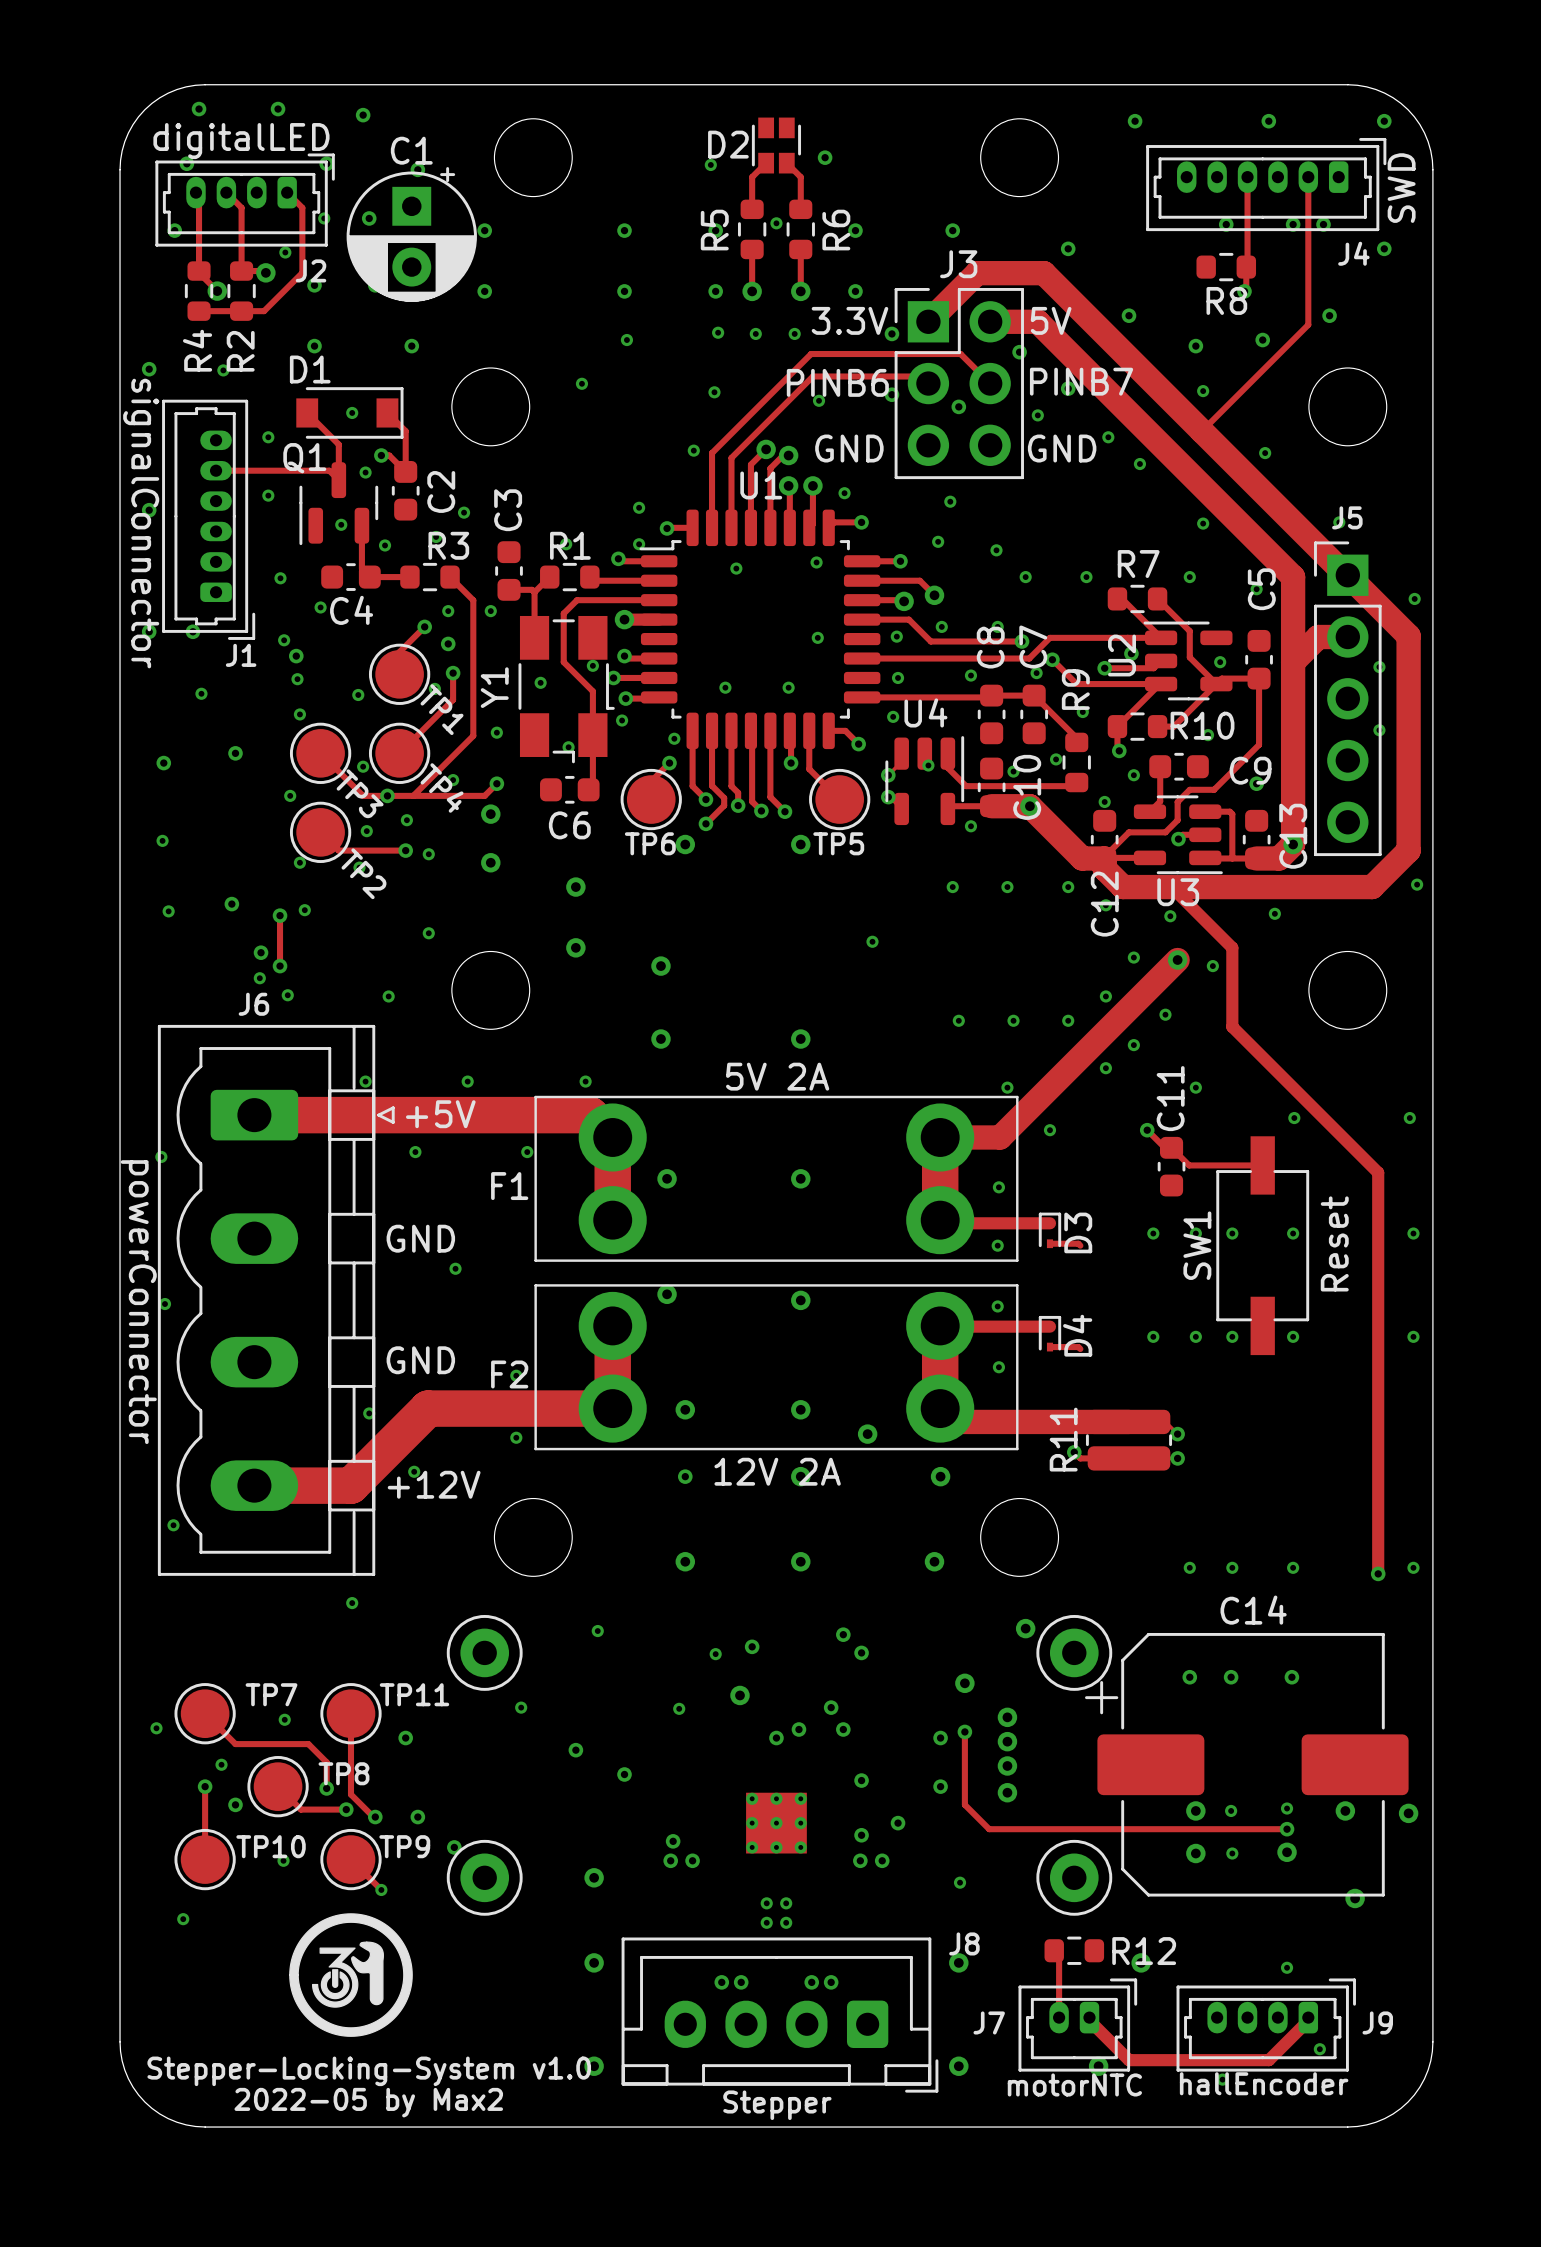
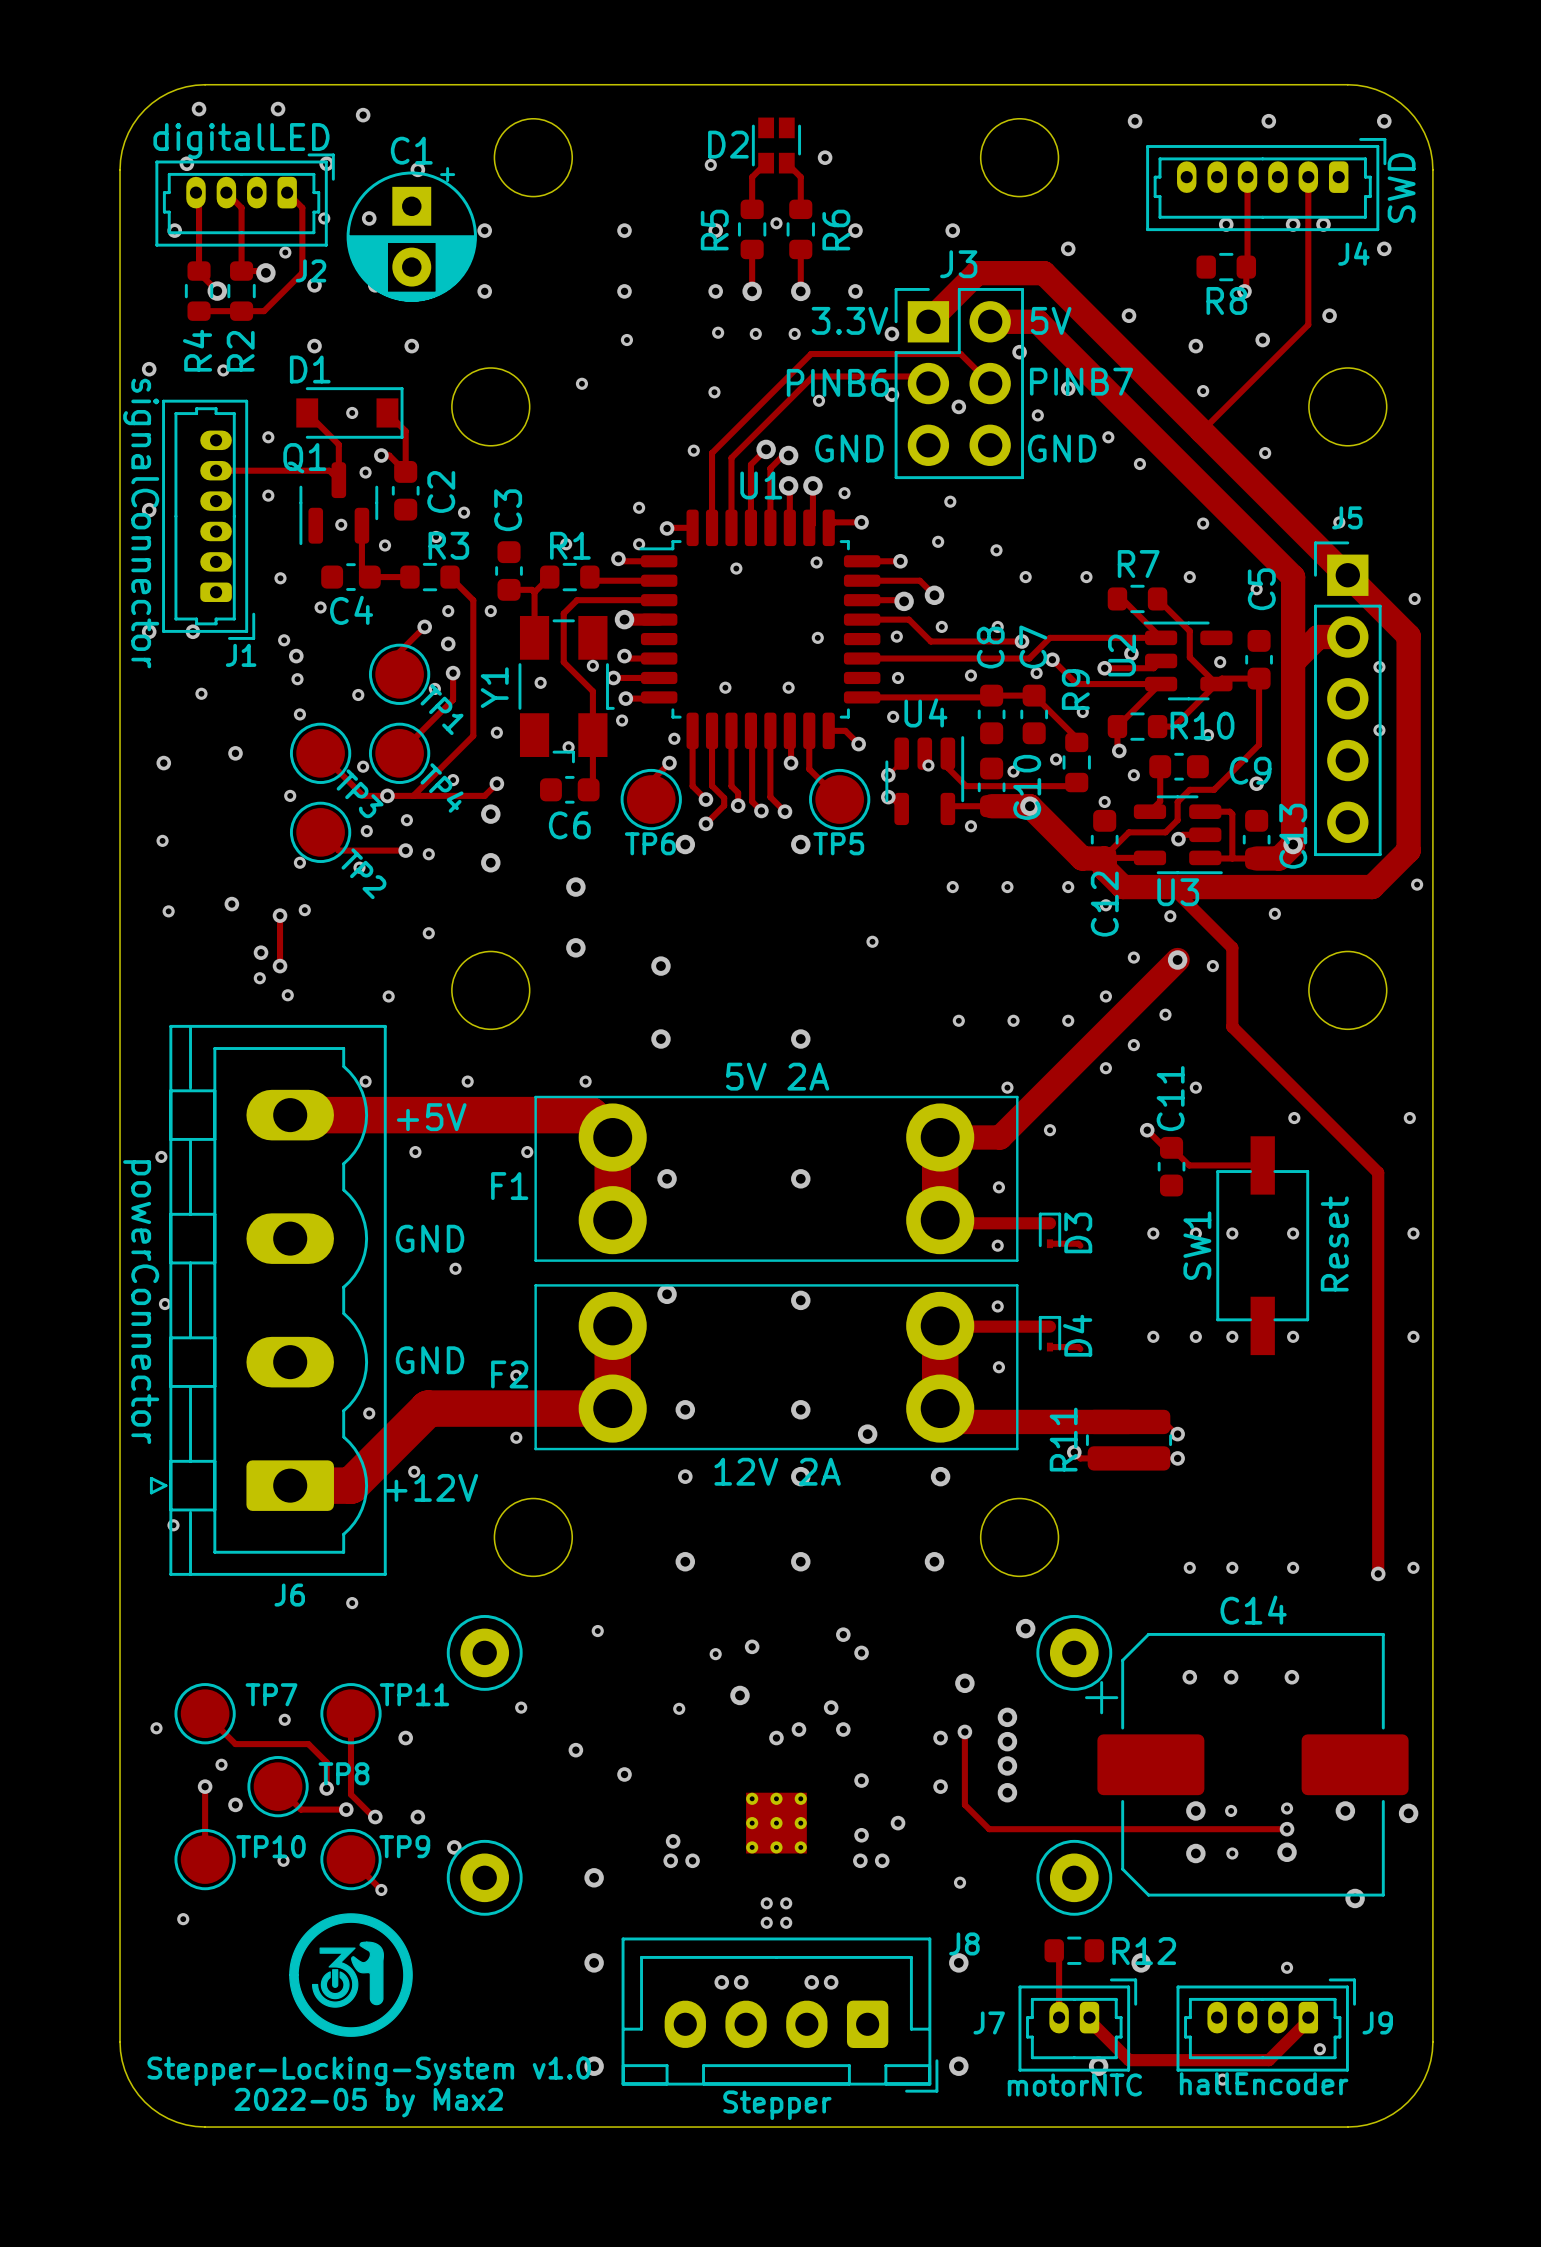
J6 name position: J6 (253, 1004) -> J6 (289, 1595)
J6 footprint: [157, 1024, 395, 1576] -> [149, 1024, 387, 1576]

